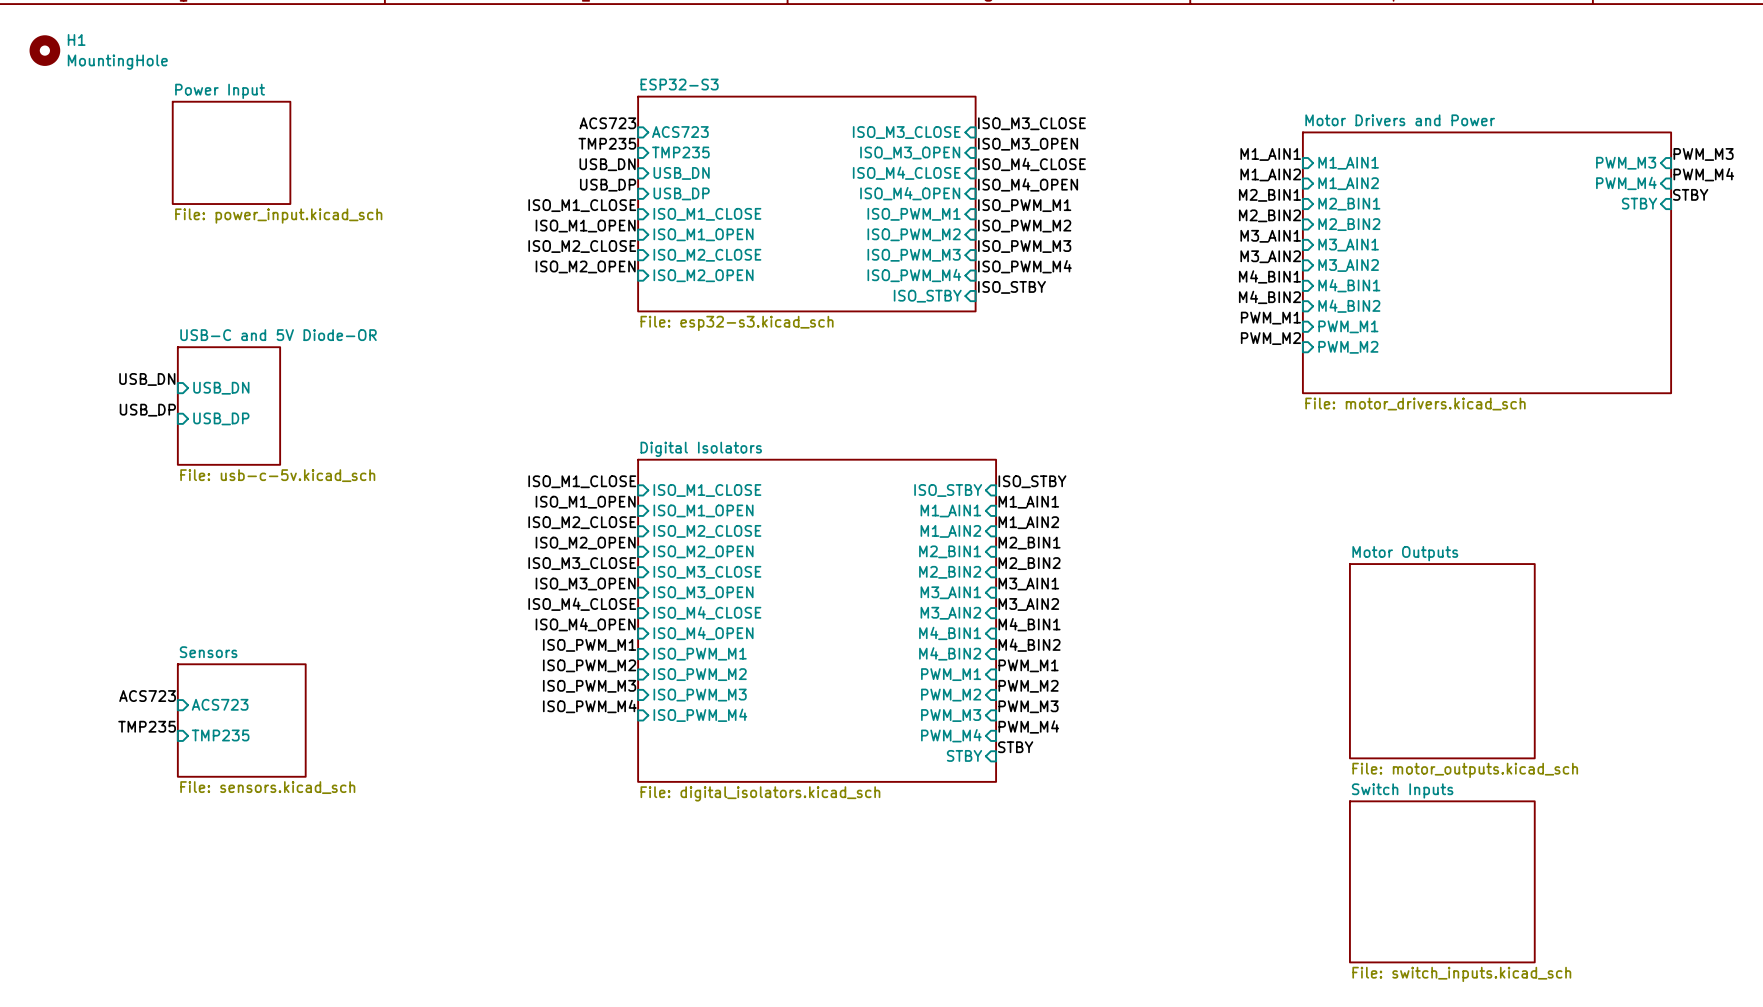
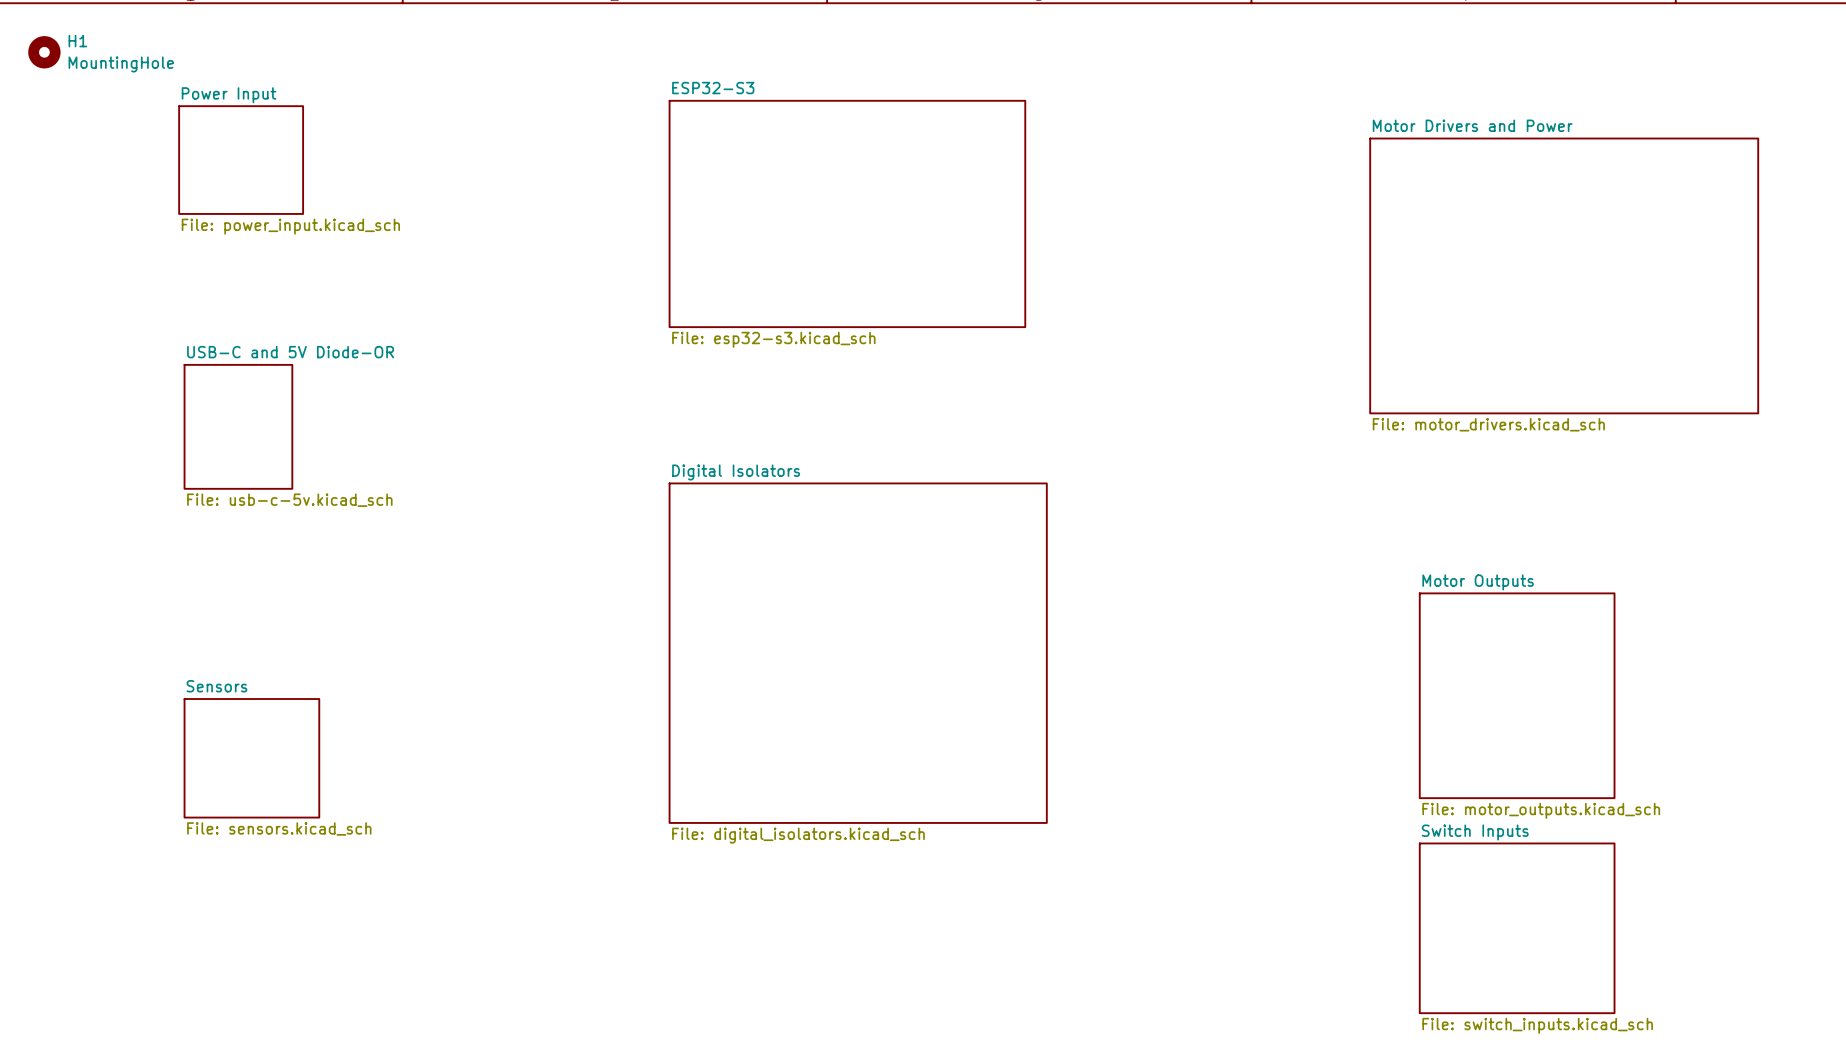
label: ACS723 (607, 123) -> none
label: ISO_M3_CLOSE (1031, 123) -> none
sheet pin: ACS723 (680, 132) -> none
sheet pin: ISO_M3_CLOSE (906, 132) -> none
label: TMP235 (607, 143) -> none
label: ISO_M3_OPEN (1028, 144) -> none
sheet pin: TMP235 (680, 152) -> none
sheet pin: ISO_M3_OPEN (910, 152) -> none
label: M1_AIN1 (1270, 154) -> none
label: PWM_M3 (1703, 154) -> none
sheet pin: M1_AIN1 (1348, 163) -> none
sheet pin: PWM_M3 (1626, 163) -> none
label: USB_DN (607, 164) -> none
label: ISO_M4_CLOSE (1031, 164) -> none
sheet pin: USB_DN (681, 173) -> none
sheet pin: ISO_M4_CLOSE (906, 173) -> none
label: M1_AIN2 (1270, 174) -> none
label: PWM_M4 (1703, 174) -> none
sheet pin: M1_AIN2 (1348, 183) -> none
sheet pin: PWM_M4 (1626, 183) -> none
label: ISO_M4_OPEN (1028, 184) -> none
label: USB_DP (608, 185) -> none
sheet pin: USB_DP (681, 193) -> none
sheet pin: ISO_M4_OPEN (910, 193) -> none
label: STBY (1690, 194) -> none
label: M2_BIN1 (1269, 195) -> none
sheet pin: STBY (1639, 203) -> none
sheet pin: M2_BIN1 (1349, 204) -> none
label: ISO_M1_CLOSE (582, 205) -> none
label: ISO_PWM_M1 (1024, 205) -> none
sheet pin: ISO_M1_CLOSE (707, 214) -> none
sheet pin: ISO_PWM_M1 (914, 214) -> none
label: M2_BIN2 (1269, 215) -> none
sheet pin: M2_BIN2 (1349, 224) -> none
label: ISO_M1_OPEN (585, 226) -> none
label: ISO_PWM_M2 (1024, 226) -> none
sheet pin: ISO_M1_OPEN (703, 234) -> none
sheet pin: ISO_PWM_M2 (914, 234) -> none
label: M3_AIN1 (1270, 236) -> none
sheet pin: M3_AIN1 (1348, 245) -> none
label: ISO_M2_CLOSE (582, 246) -> none
label: ISO_PWM_M3 (1024, 246) -> none
sheet pin: ISO_M2_CLOSE (707, 255) -> none
sheet pin: ISO_PWM_M3 (914, 255) -> none
label: M3_AIN2 (1270, 256) -> none
sheet pin: M3_AIN2 (1348, 265) -> none
label: ISO_M2_OPEN (585, 266) -> none
label: ISO_PWM_M4 (1024, 266) -> none
sheet pin: ISO_M2_OPEN (703, 275) -> none
sheet pin: ISO_PWM_M4 (914, 275) -> none
label: M4_BIN1 (1269, 276) -> none
sheet pin: M4_BIN1 (1349, 285) -> none
label: ISO_STBY (1011, 287) -> none
sheet pin: ISO_STBY (927, 296) -> none
label: M4_BIN2 (1269, 297) -> none
sheet pin: M4_BIN2 (1349, 306) -> none
label: PWM_M1 (1270, 318) -> none
sheet pin: PWM_M1 (1348, 326) -> none
label: PWM_M2 (1270, 338) -> none
sheet pin: PWM_M2 (1348, 347) -> none
label: USB_DN (147, 379) -> none
sheet pin: USB_DN (221, 388) -> none
label: USB_DP (147, 410) -> none
sheet pin: USB_DP (221, 418) -> none
label: ISO_M1_CLOSE (582, 481) -> none
label: ISO_STBY (1032, 481) -> none
sheet pin: ISO_M1_CLOSE (707, 490) -> none
sheet pin: ISO_STBY (948, 490) -> none
label: ISO_M1_OPEN (585, 502) -> none
label: M1_AIN1 (1028, 502) -> none
sheet pin: ISO_M1_OPEN (703, 510) -> none
sheet pin: M1_AIN1 (950, 510) -> none
label: ISO_M2_CLOSE (582, 522) -> none
label: M1_AIN2 (1028, 522) -> none
sheet pin: ISO_M2_CLOSE (707, 531) -> none
sheet pin: M1_AIN2 (950, 531) -> none
label: ISO_M2_OPEN (585, 543) -> none
label: M2_BIN1 (1029, 543) -> none
sheet pin: ISO_M2_OPEN (703, 551) -> none
sheet pin: M2_BIN1 (950, 551) -> none
label: ISO_M3_CLOSE (582, 563) -> none
label: M2_BIN2 (1029, 563) -> none
sheet pin: ISO_M3_CLOSE (707, 572) -> none
sheet pin: M2_BIN2 (950, 572) -> none
label: ISO_M3_OPEN (585, 584) -> none
label: M3_AIN1 (1028, 584) -> none
sheet pin: ISO_M3_OPEN (703, 592) -> none
sheet pin: M3_AIN1 (950, 592) -> none
label: ISO_M4_CLOSE (582, 604) -> none
label: M3_AIN2 (1028, 604) -> none
sheet pin: ISO_M4_CLOSE (707, 612) -> none
sheet pin: M3_AIN2 (950, 613) -> none
label: ISO_M4_OPEN (585, 624) -> none
label: M4_BIN1 (1029, 624) -> none
sheet pin: ISO_M4_OPEN (703, 633) -> none
sheet pin: M4_BIN1 (950, 633) -> none
label: ISO_PWM_M1 (589, 645) -> none
label: M4_BIN2 (1029, 645) -> none
sheet pin: M4_BIN2 (950, 653) -> none
sheet pin: ISO_PWM_M1 (700, 654) -> none
label: ISO_PWM_M2 (589, 665) -> none
label: PWM_M1 (1028, 665) -> none
sheet pin: ISO_PWM_M2 (700, 674) -> none
sheet pin: PWM_M1 (951, 674) -> none
label: ISO_PWM_M3 (589, 686) -> none
label: PWM_M2 (1028, 686) -> none
sheet pin: ISO_PWM_M3 (700, 695) -> none
sheet pin: PWM_M2 (951, 695) -> none
label: ACS723 (147, 696) -> none
sheet pin: ACS723 (220, 704) -> none
label: ISO_PWM_M4 (589, 706) -> none
label: PWM_M3 (1028, 706) -> none
sheet pin: ISO_PWM_M4 (700, 715) -> none
sheet pin: PWM_M3 (951, 715) -> none
label: TMP235 (147, 726) -> none
label: PWM_M4 (1028, 726) -> none
sheet pin: TMP235 (220, 735) -> none
sheet pin: PWM_M4 (951, 735) -> none
label: STBY (1015, 747) -> none
sheet pin: STBY (964, 755) -> none

